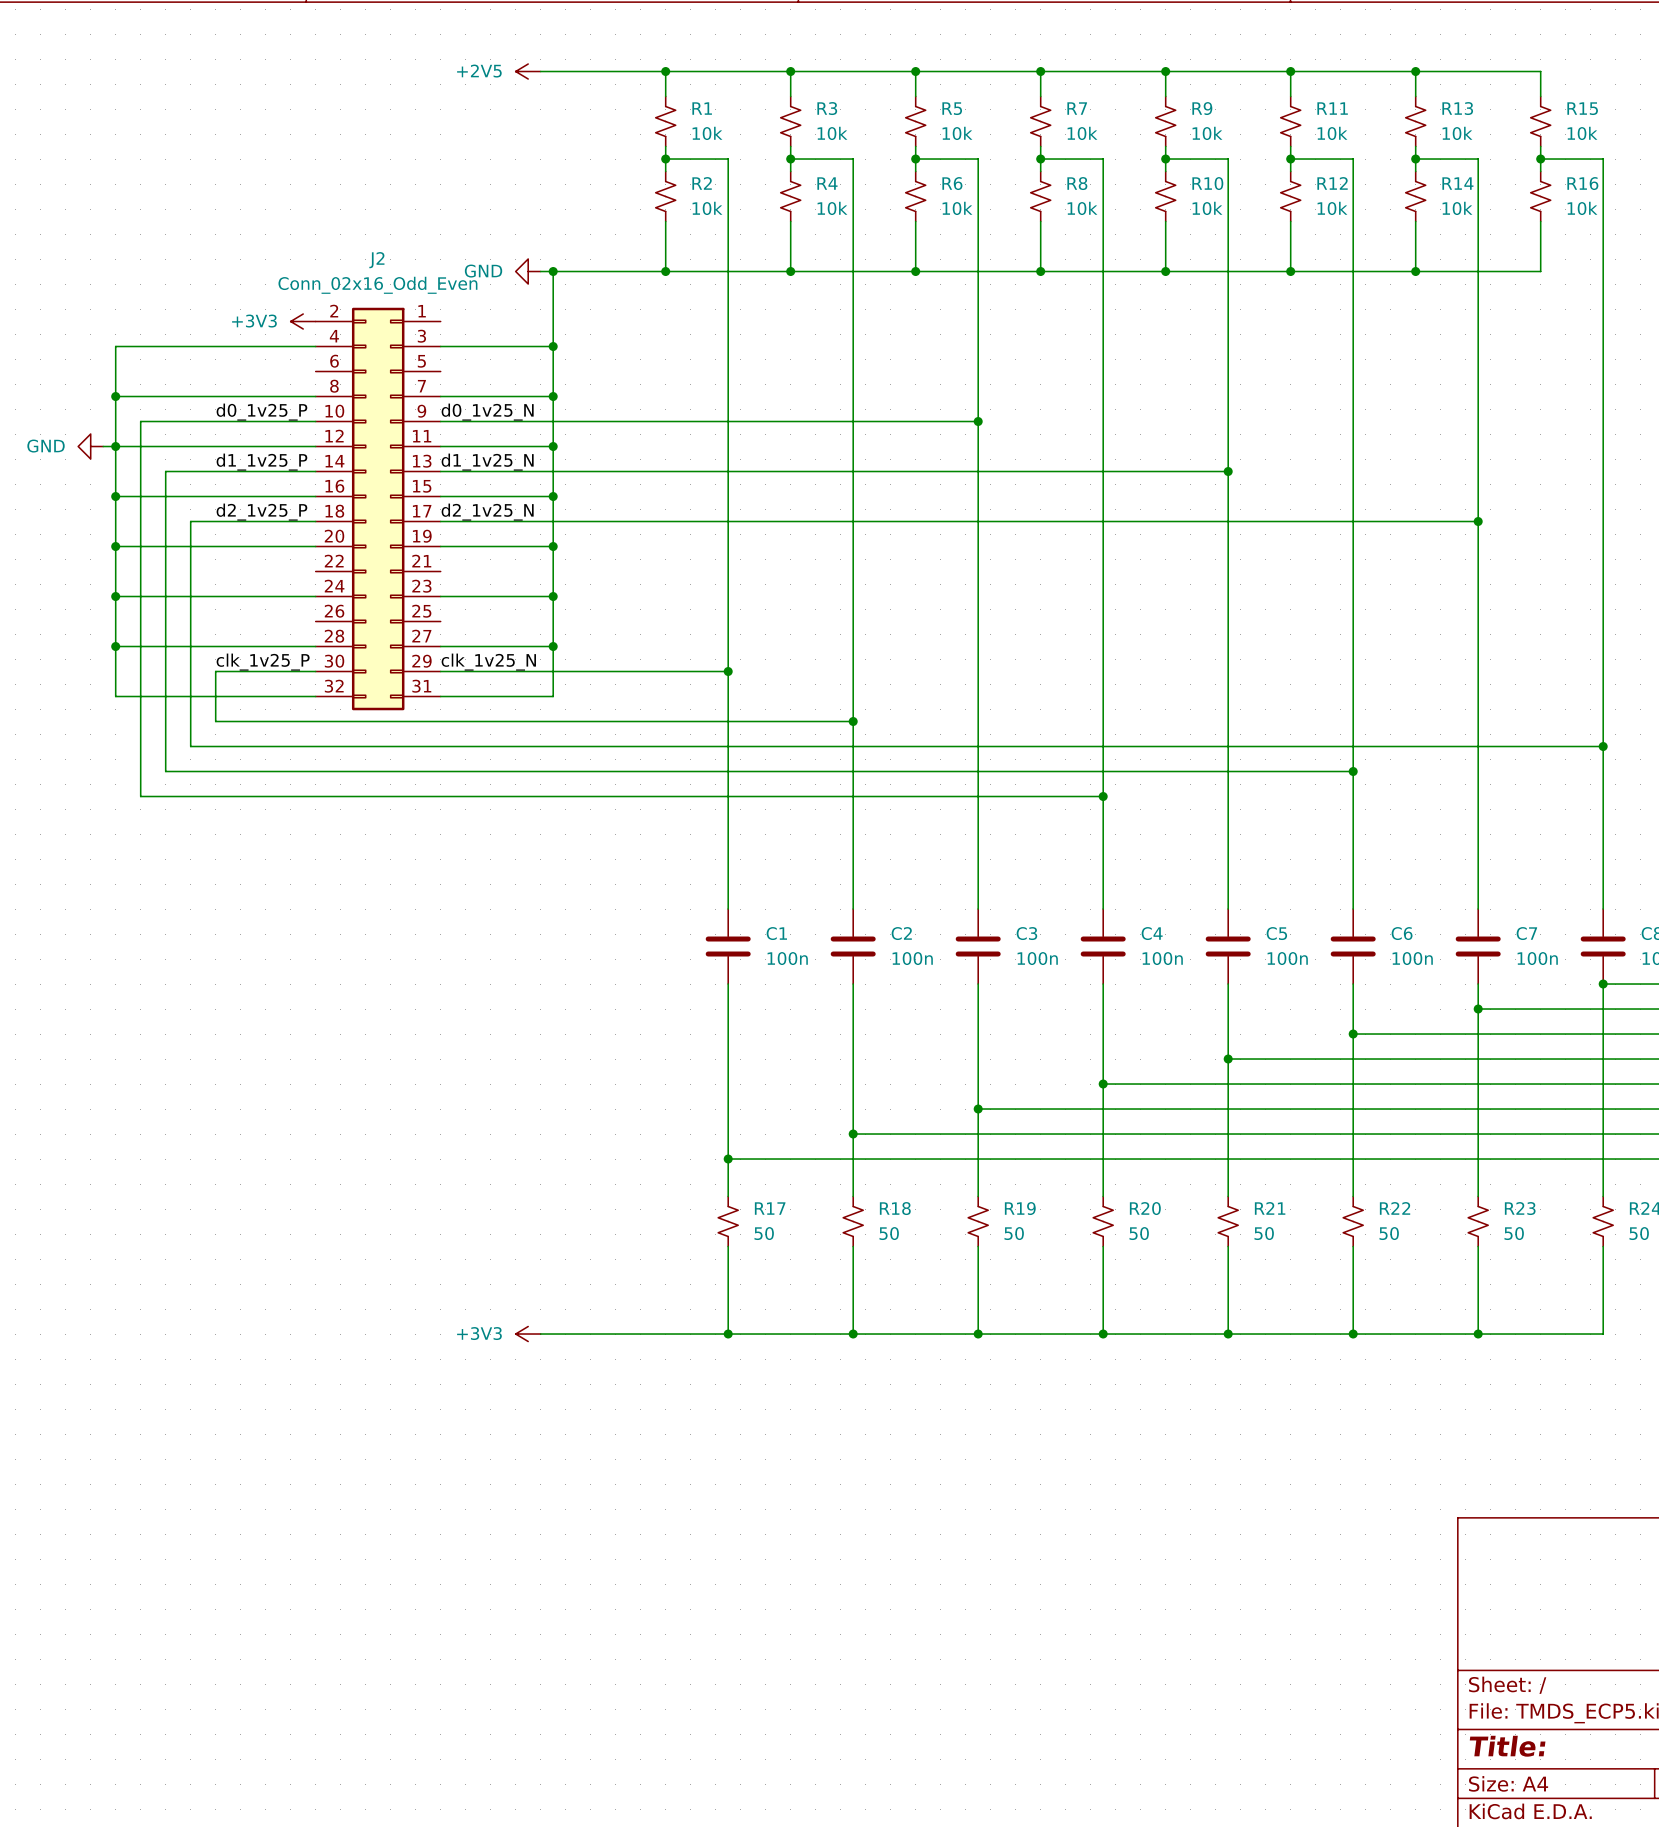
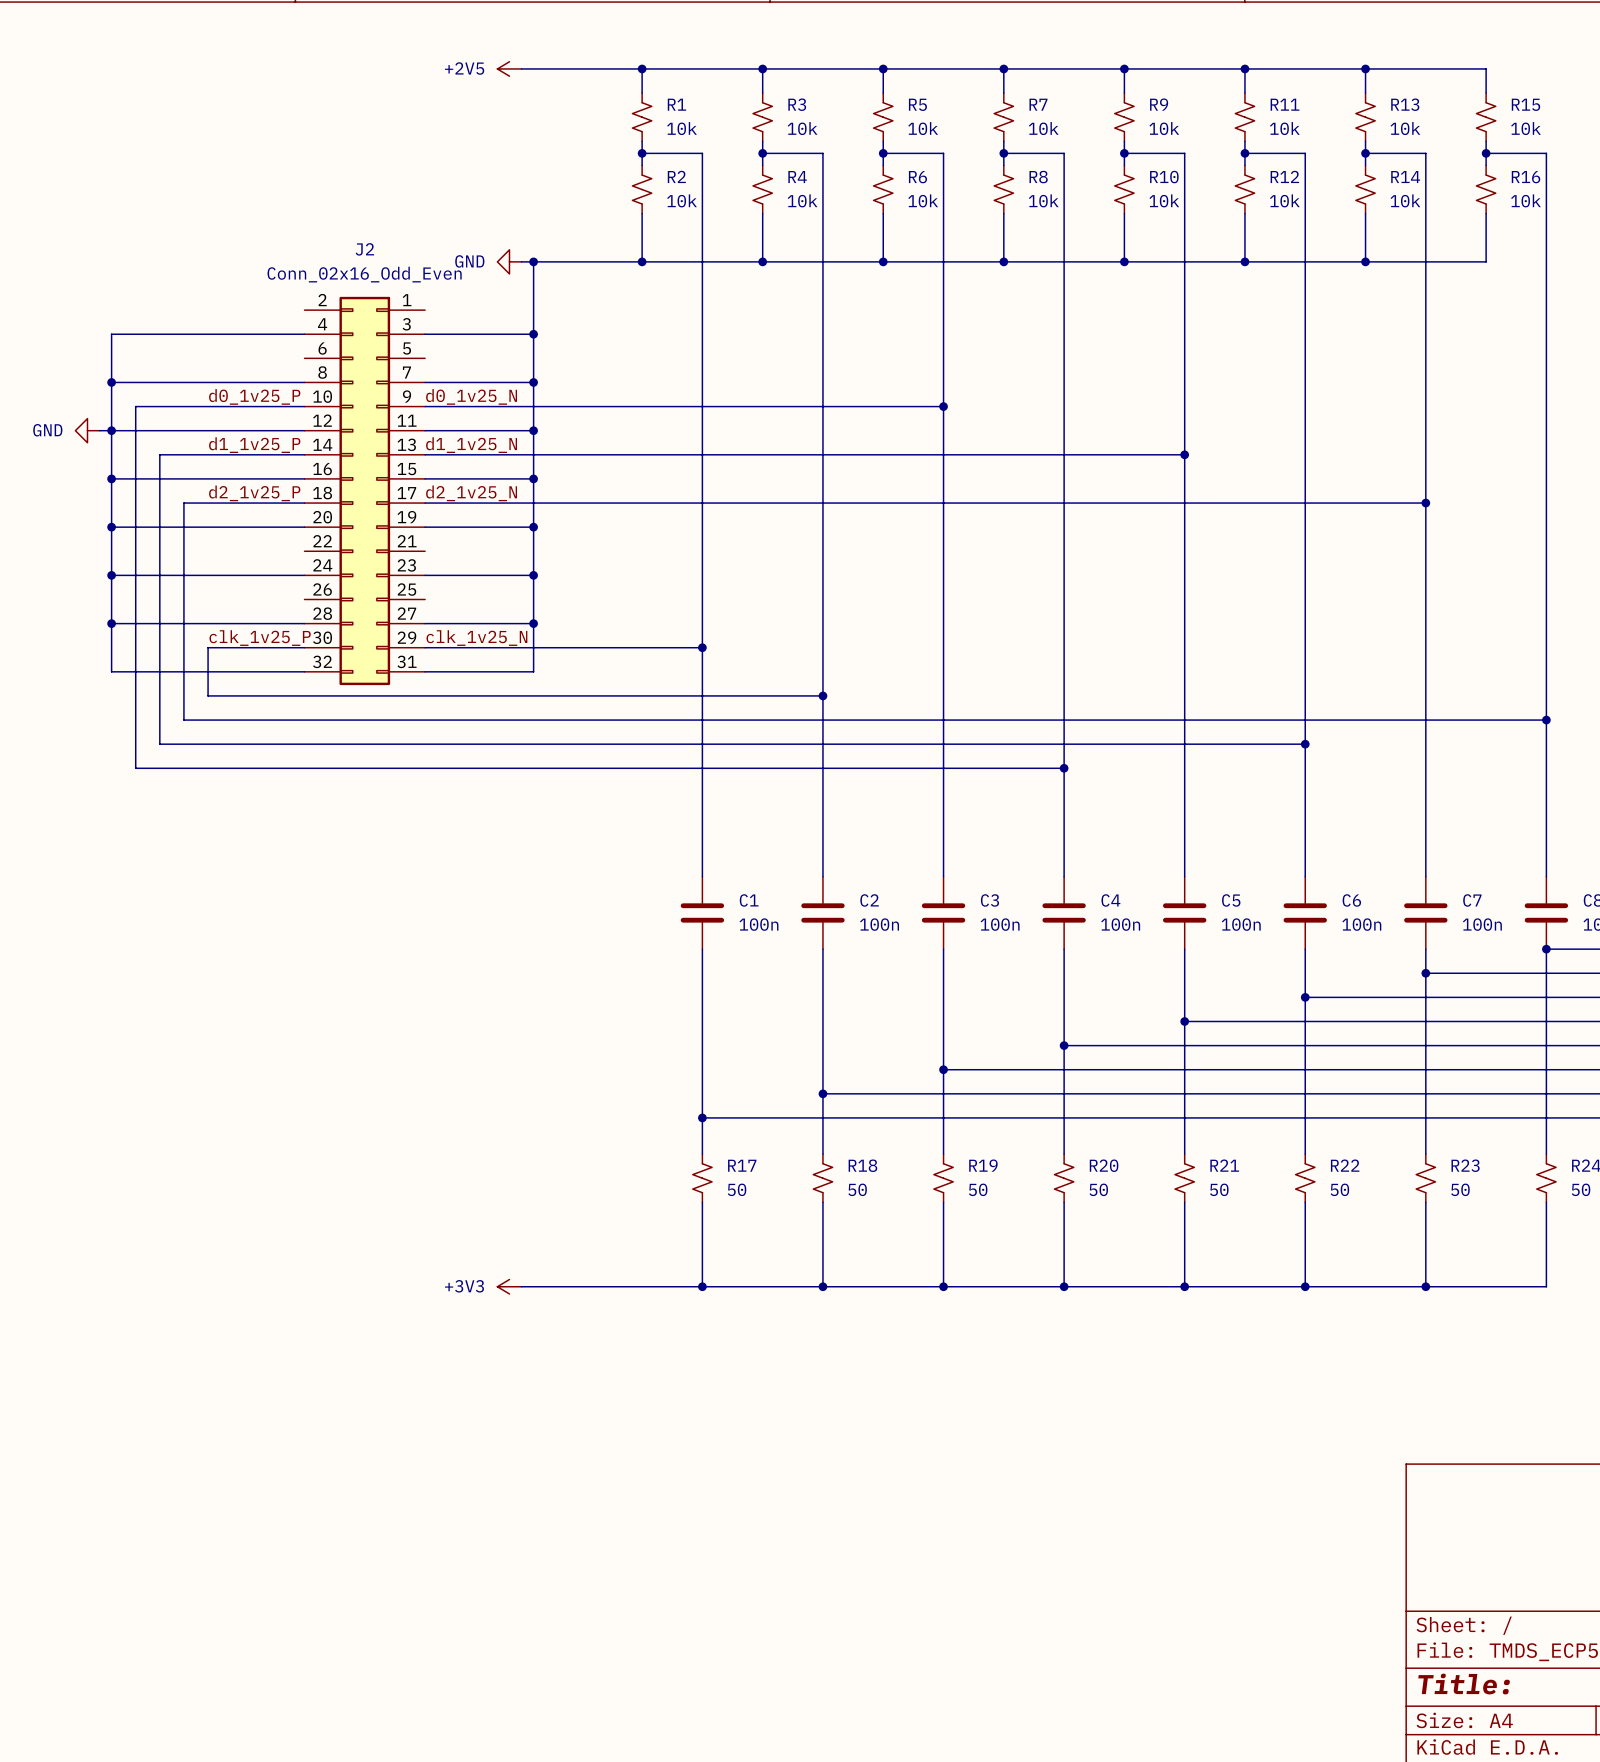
power symbol: +3V3 (303, 321) -> none

